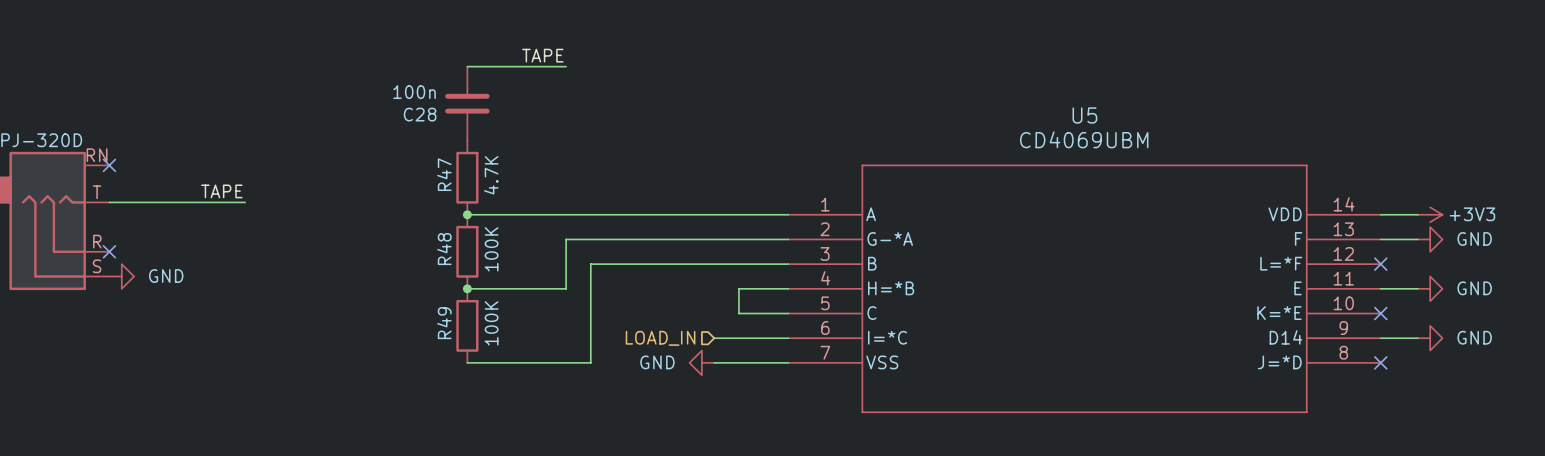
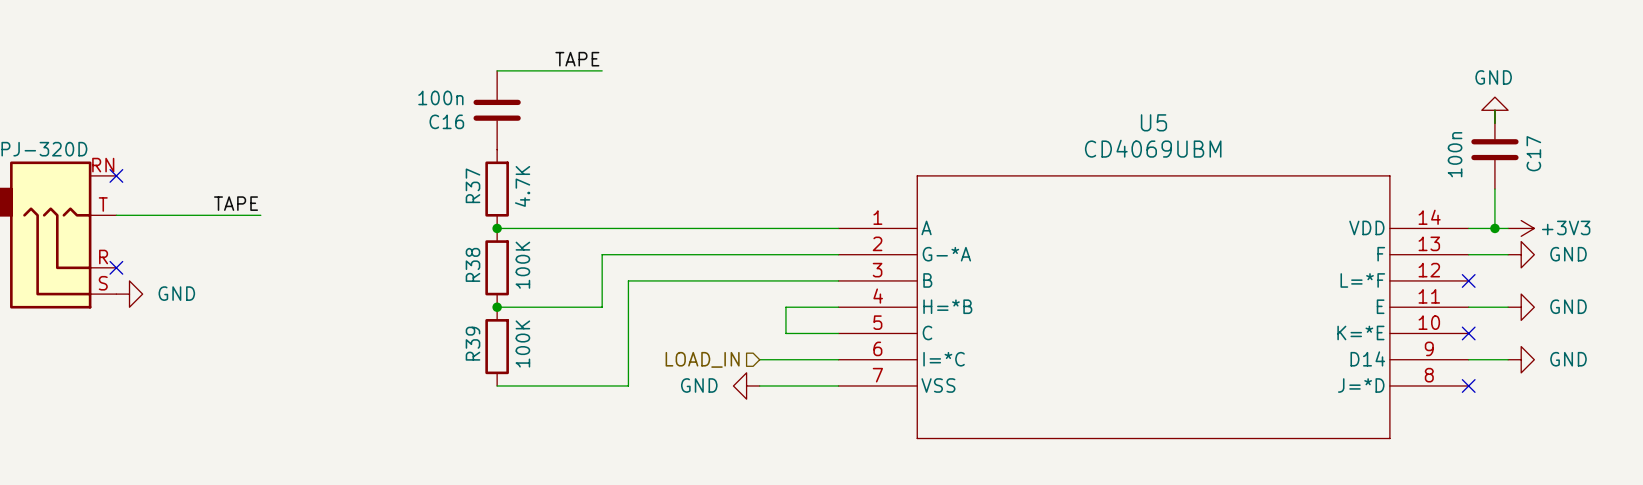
wire: none -> (1494, 110) (1494, 123)
power symbol: none -> GND (1494, 110)
C28 name: C28 (420, 114) -> C16 (446, 121)
C17: none -> 100n (1494, 149)
R47 name: R47 (444, 174) -> R37 (473, 185)
wire: none -> (1494, 189) (1494, 228)
junction: none -> (1494, 228)
R48 name: R48 (444, 249) -> R38 (473, 264)
R49 name: R49 (444, 323) -> R39 (473, 343)

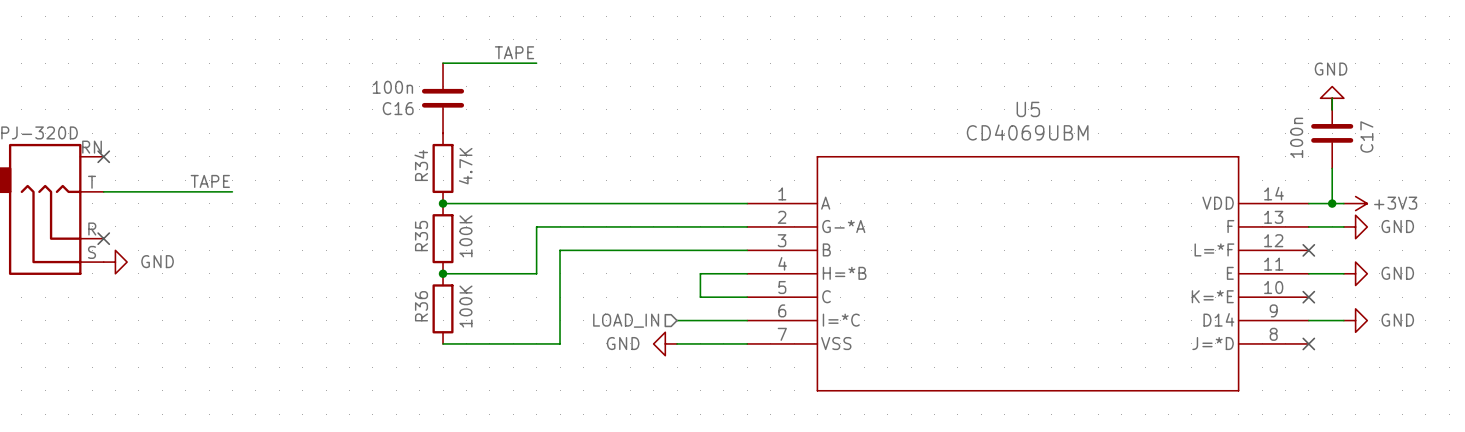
R37 name: R37 (473, 185) -> R34 (421, 165)
R38 name: R38 (473, 264) -> R35 (421, 236)
R39 name: R39 (473, 343) -> R36 (421, 306)

